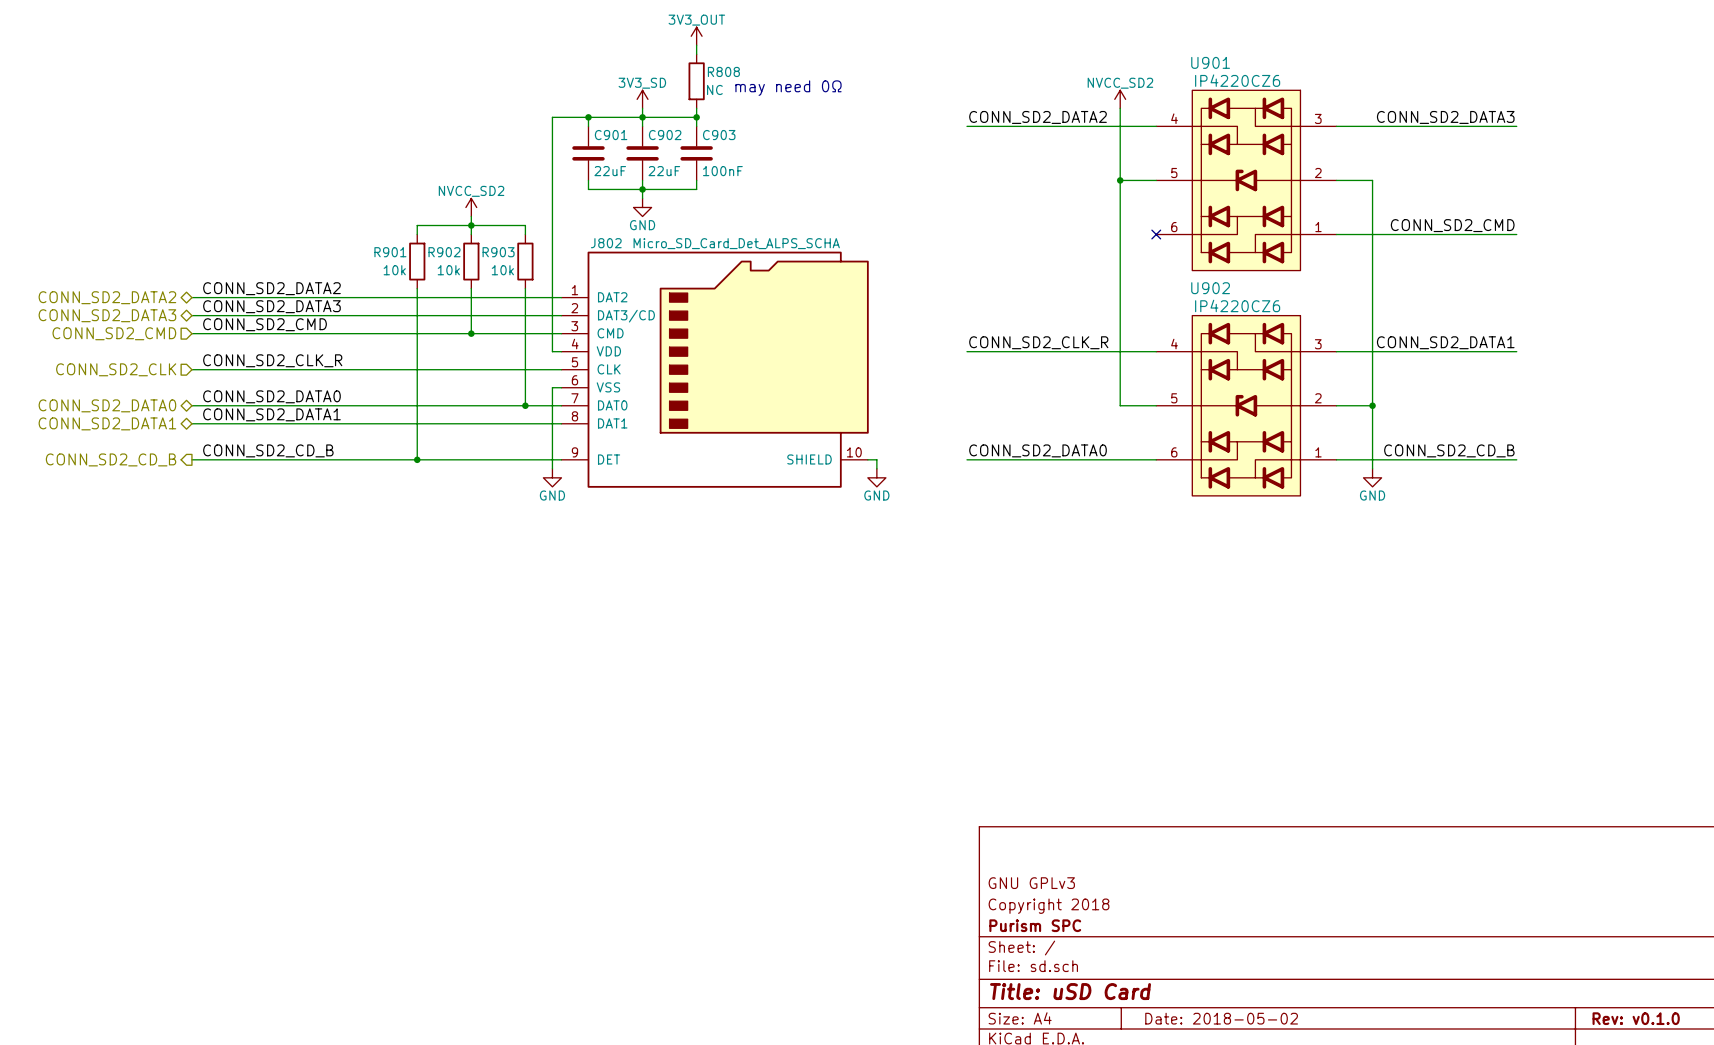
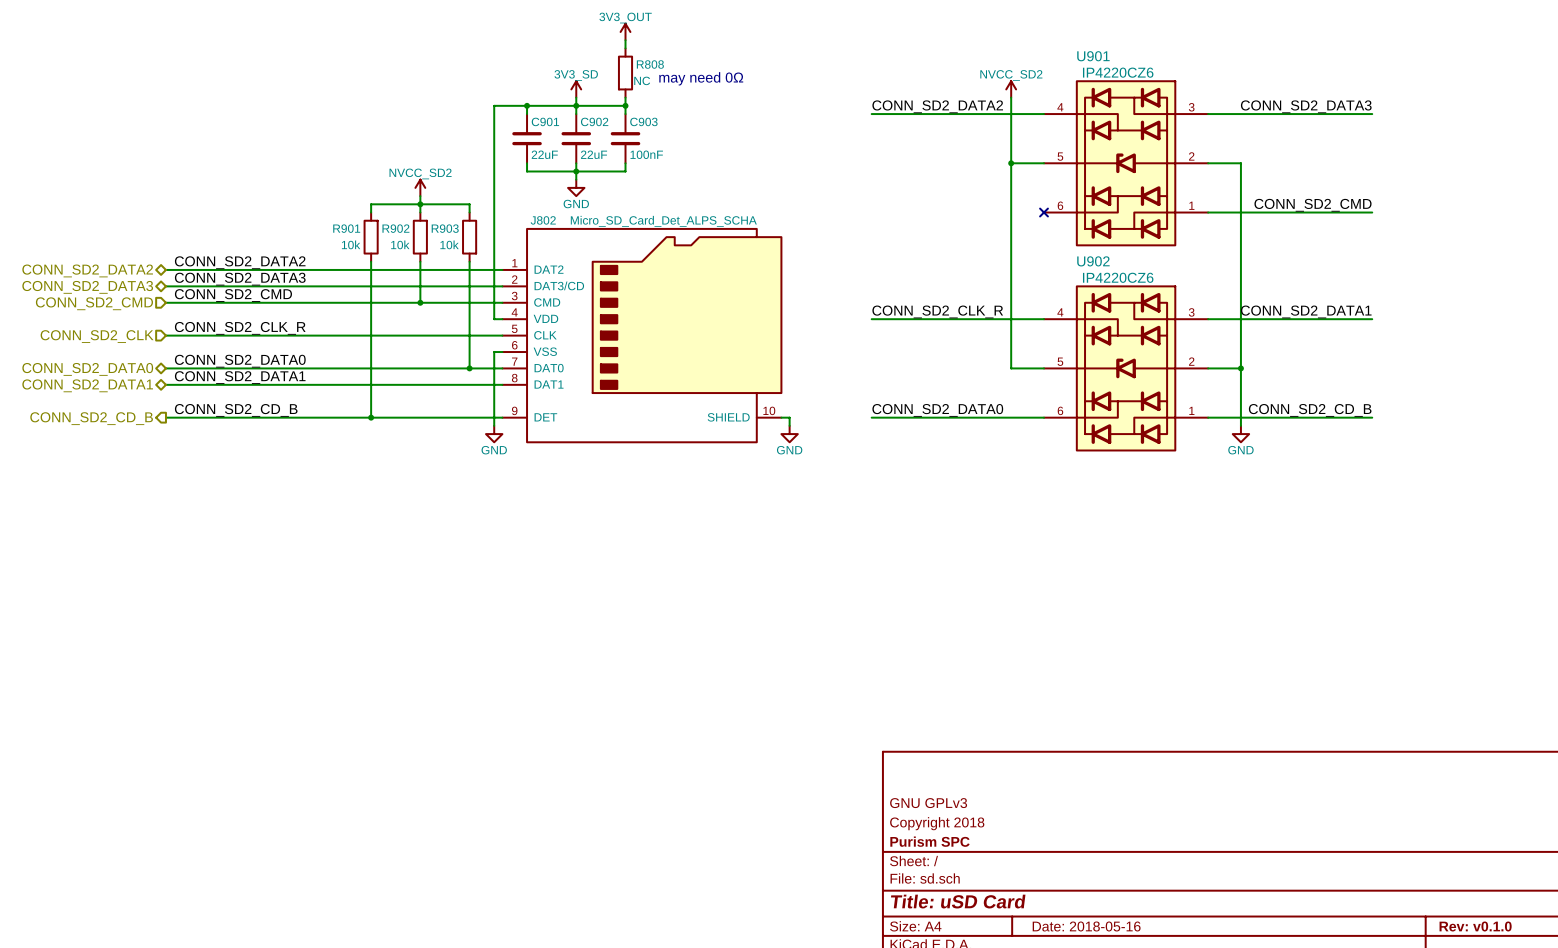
title block: Date: 2018-05-02 (1221, 1018) -> Date: 2018-05-16 (1086, 926)

